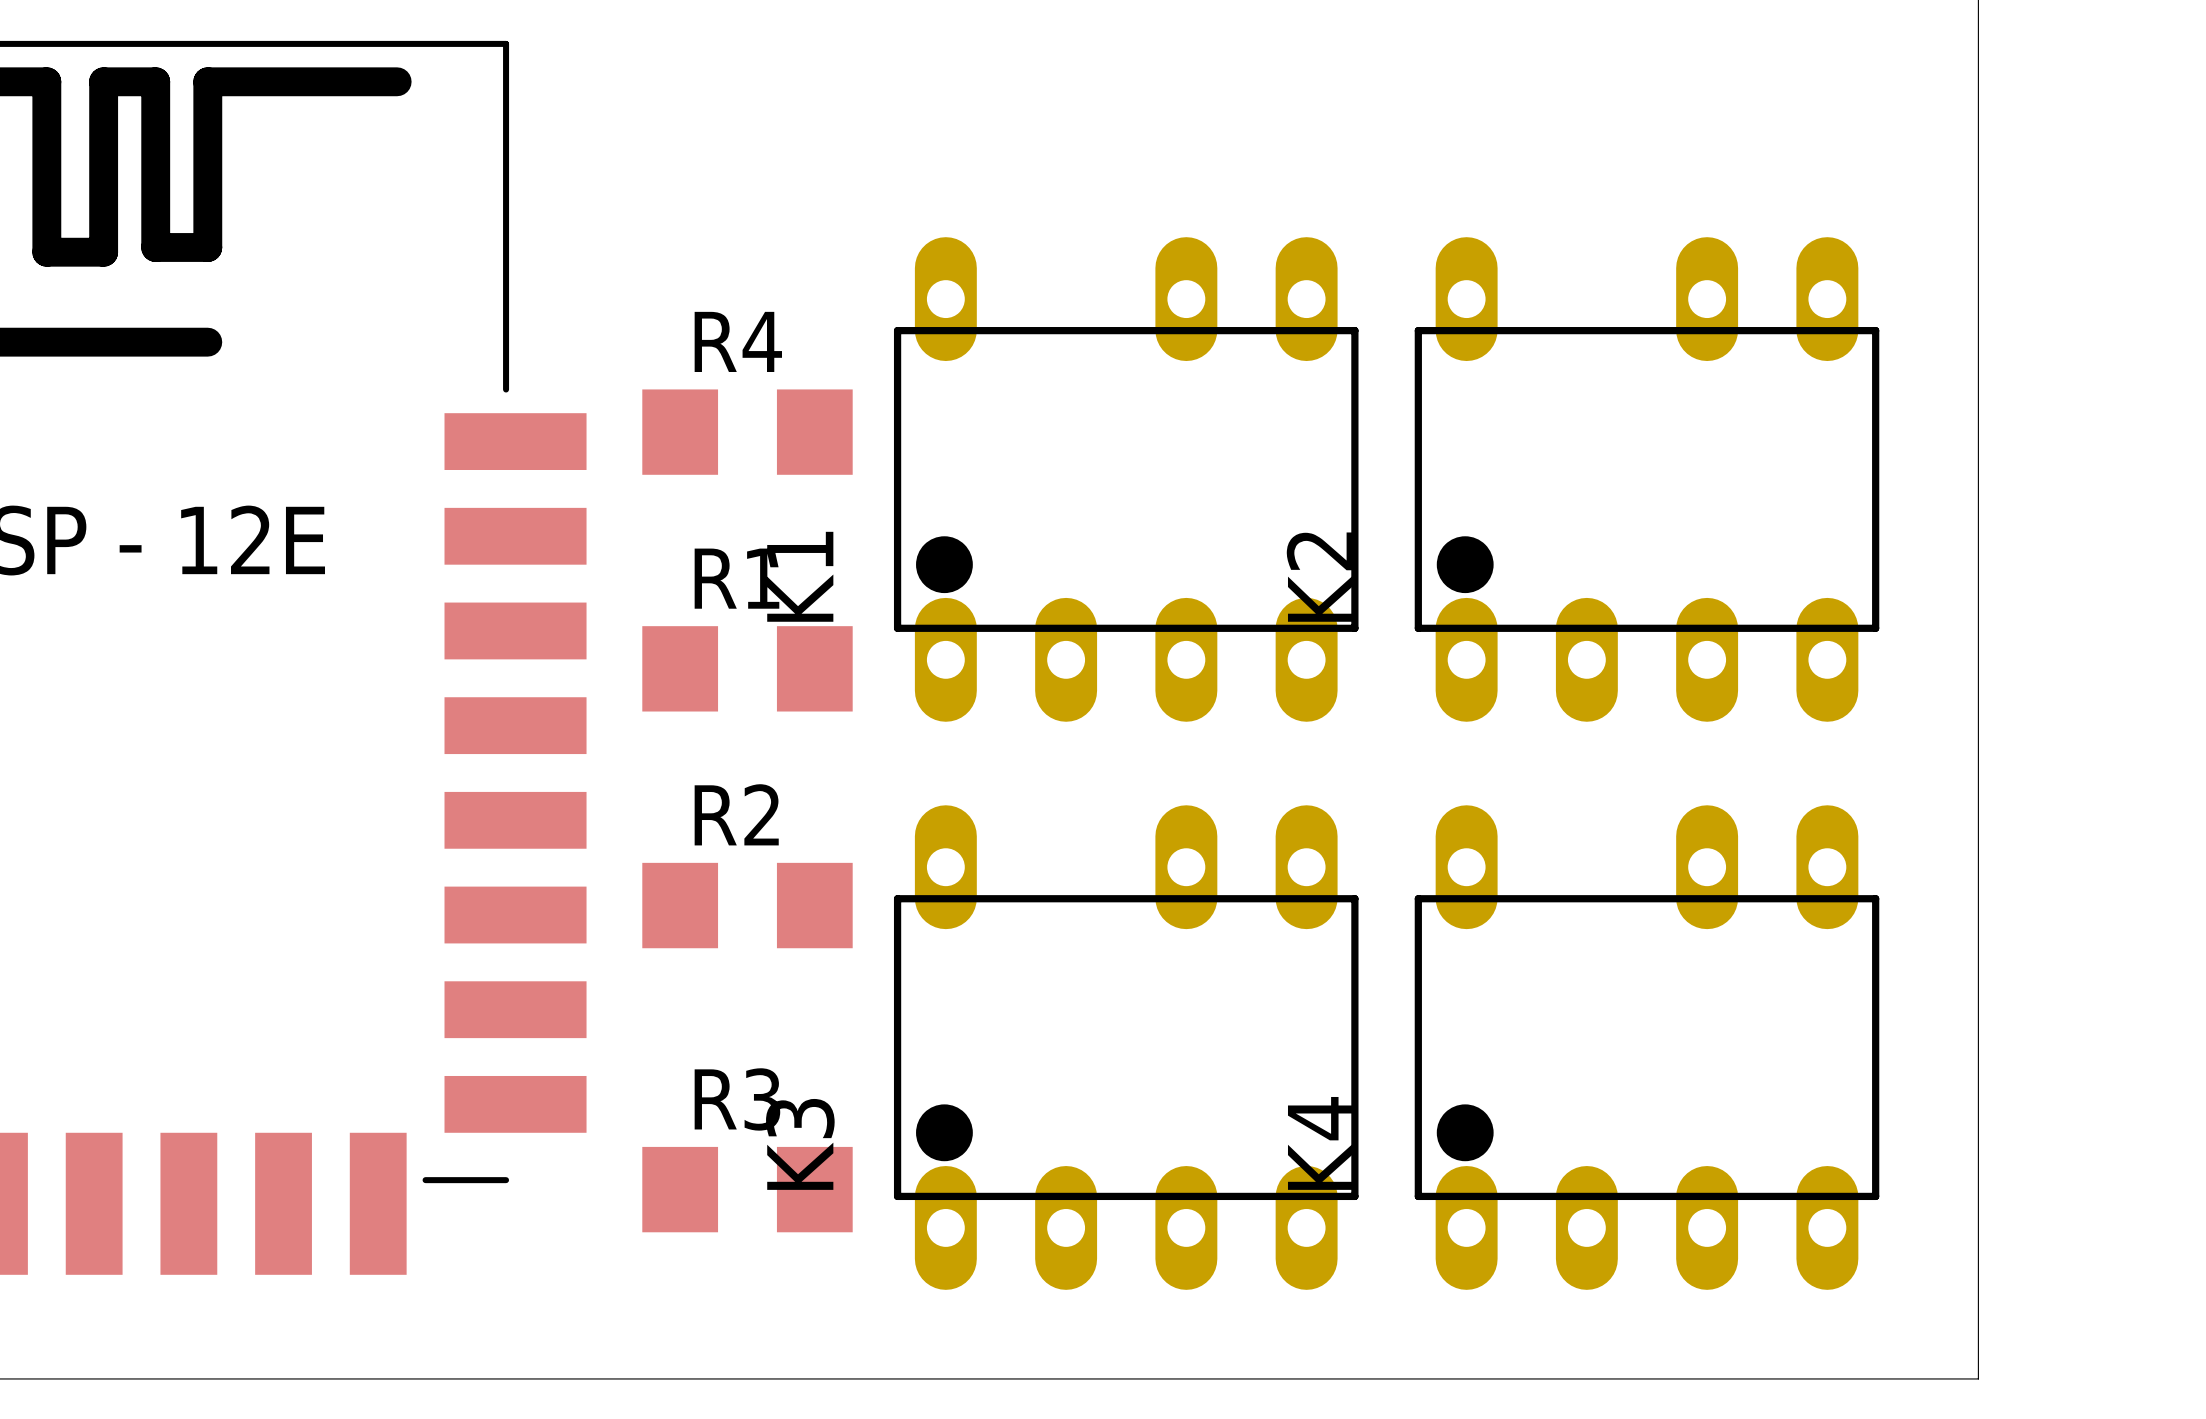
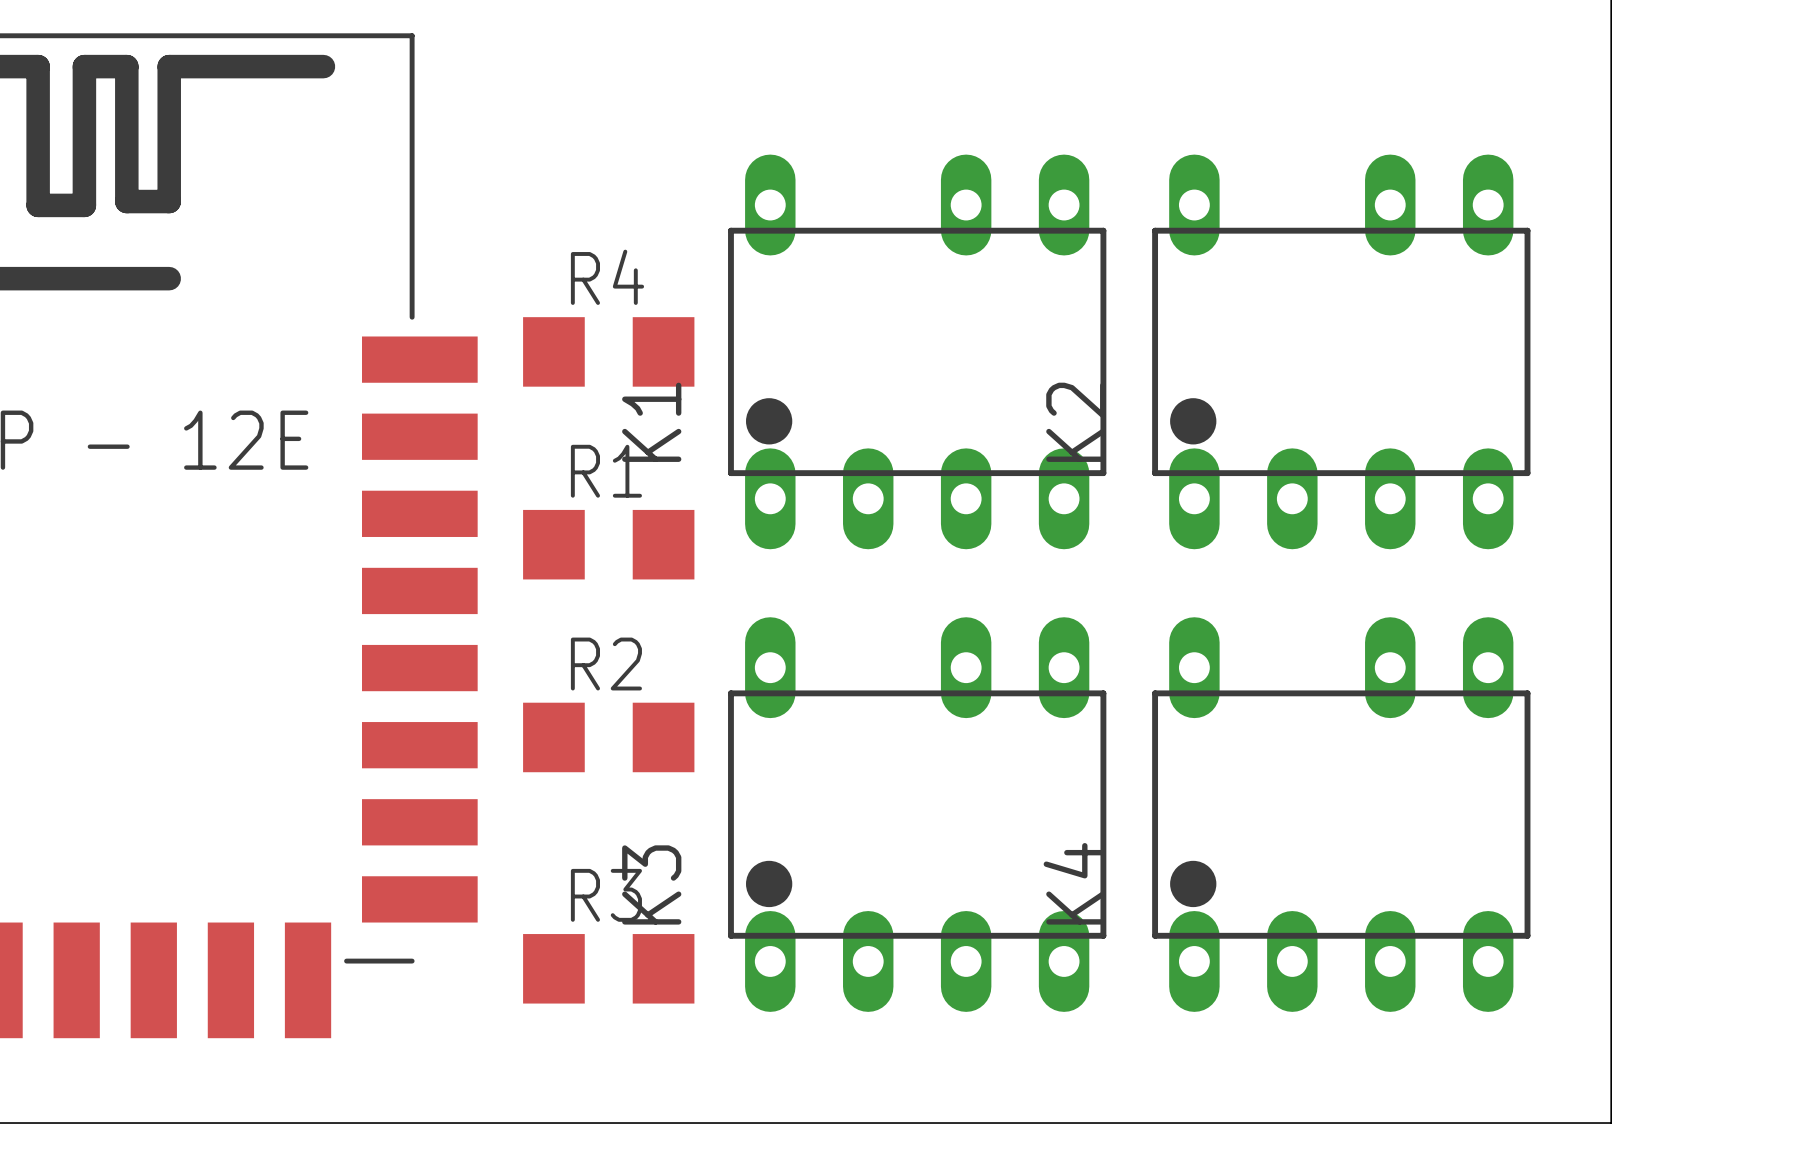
K1 position: (1126, 479) -> (917, 351)
K2 position: (1647, 479) -> (1341, 351)
K3 position: (1126, 1047) -> (917, 814)
K4 position: (1647, 1047) -> (1341, 814)

